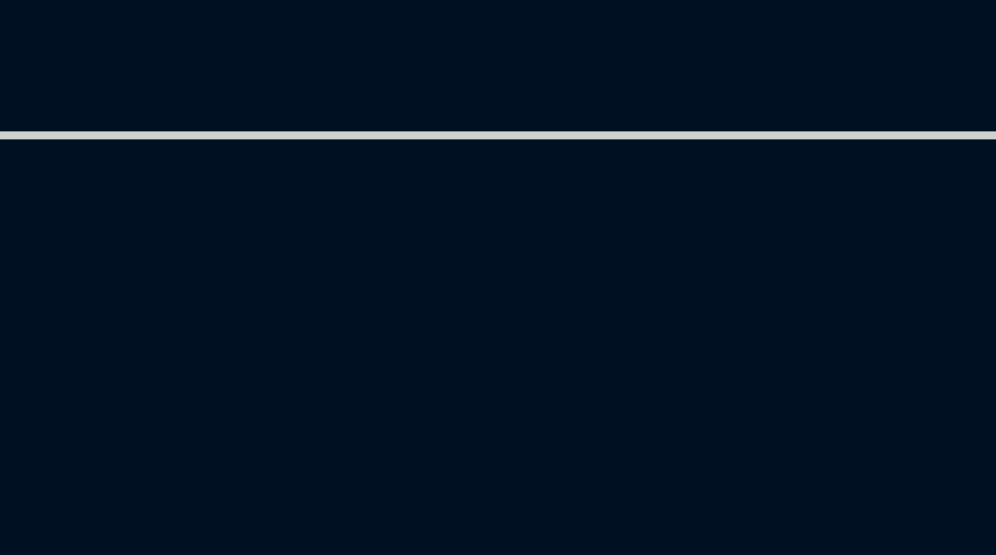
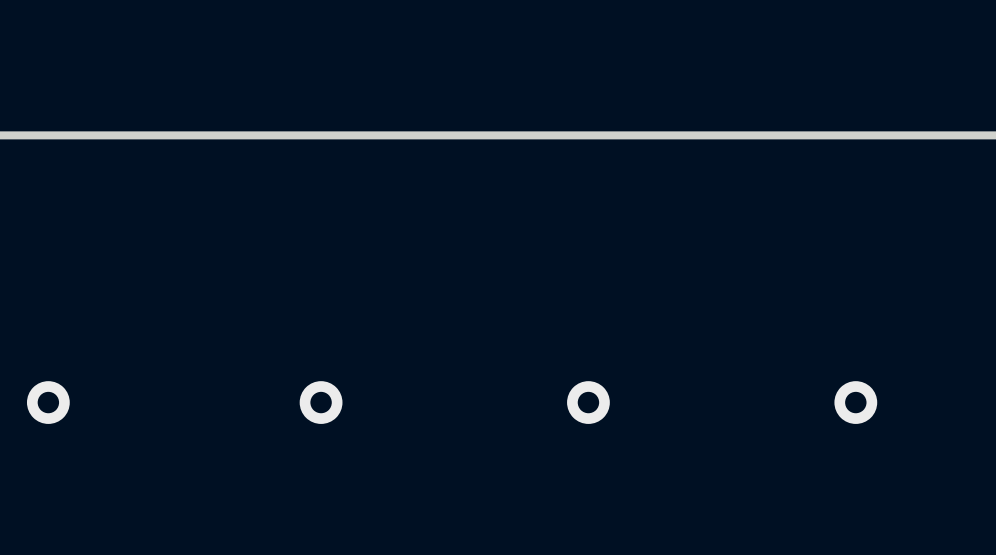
via: none -> (48, 402)
via: none -> (321, 402)
via: none -> (588, 402)
via: none -> (855, 402)

